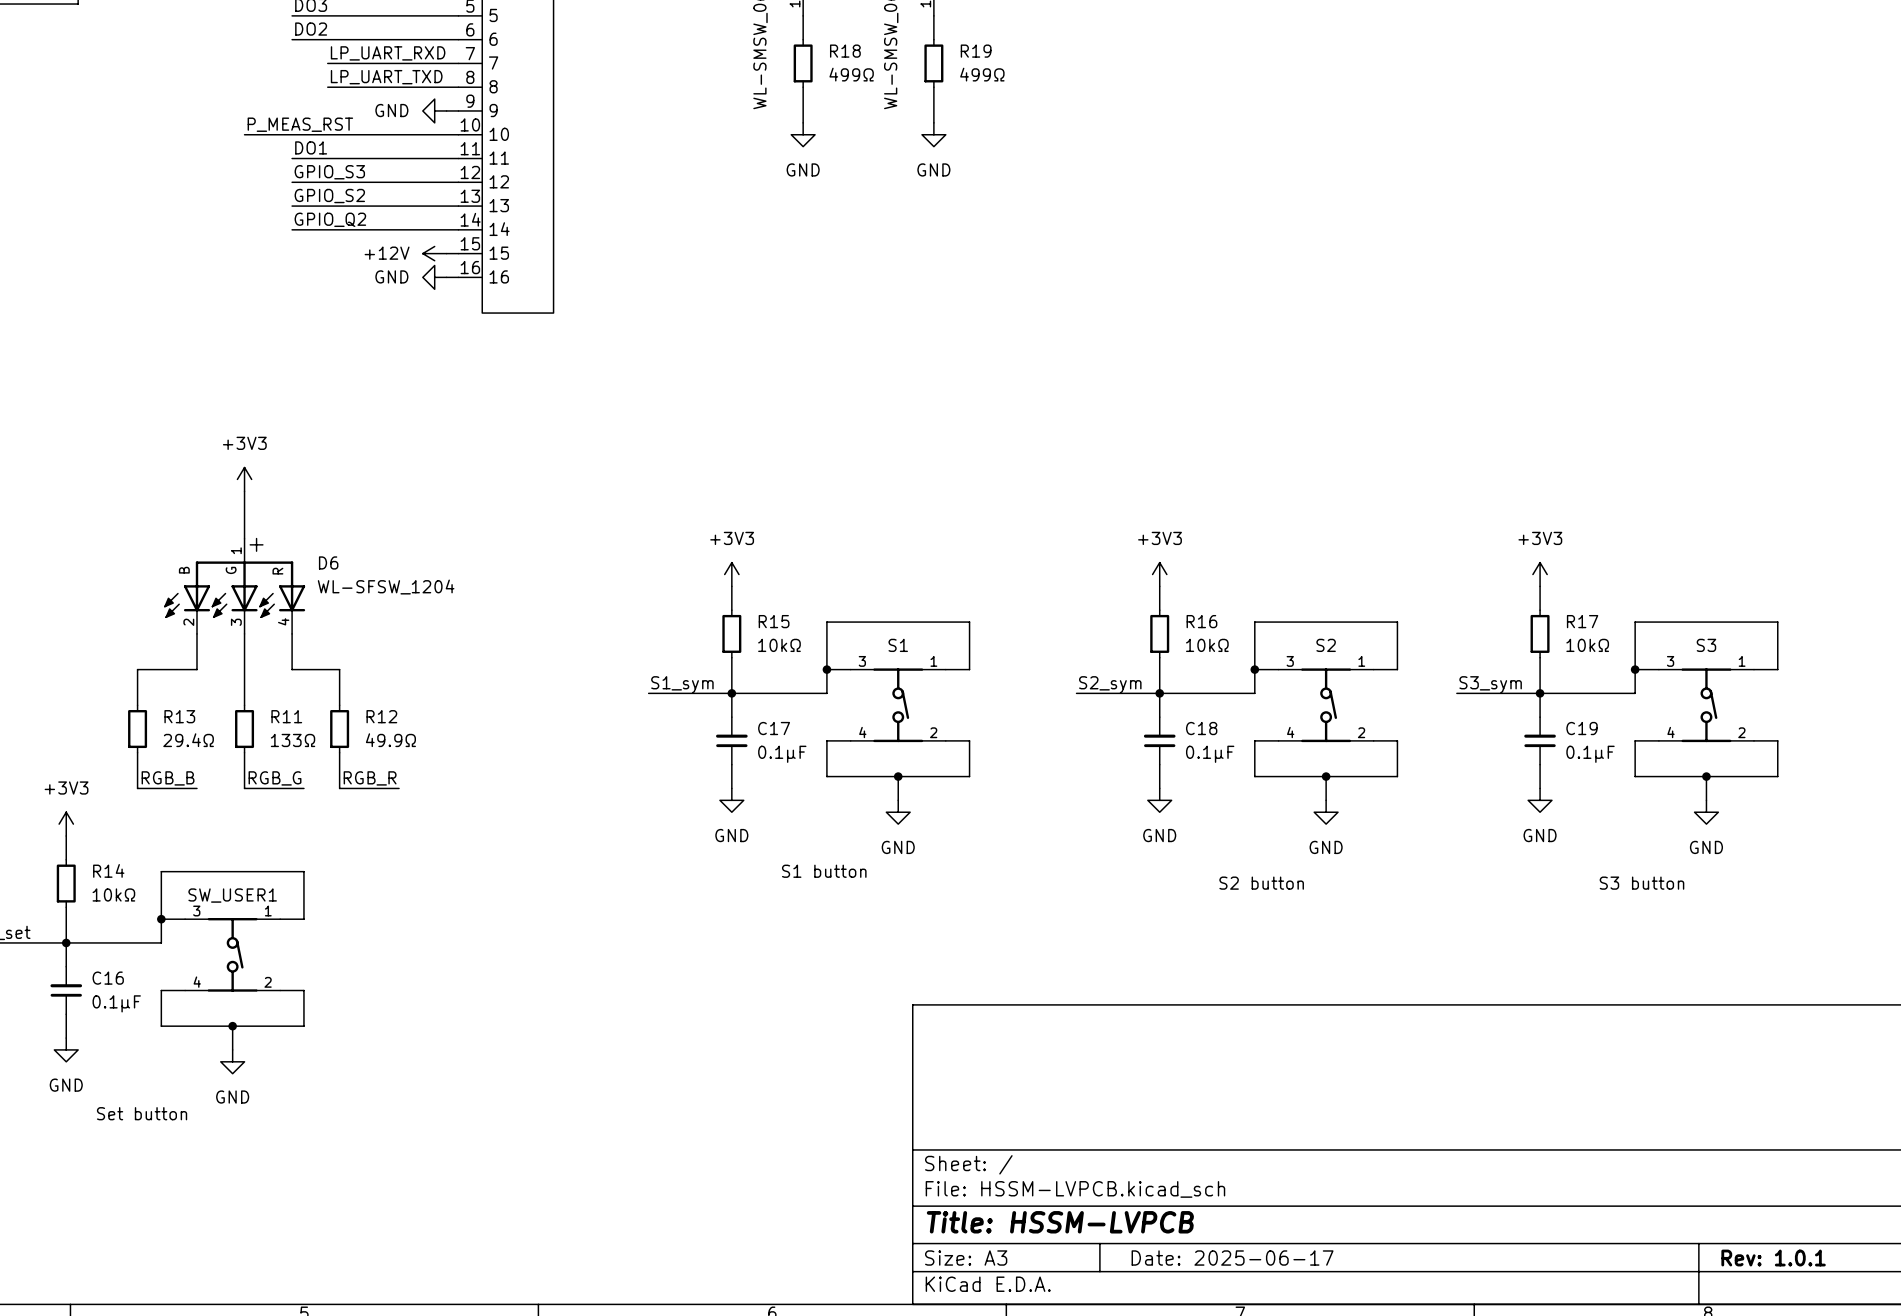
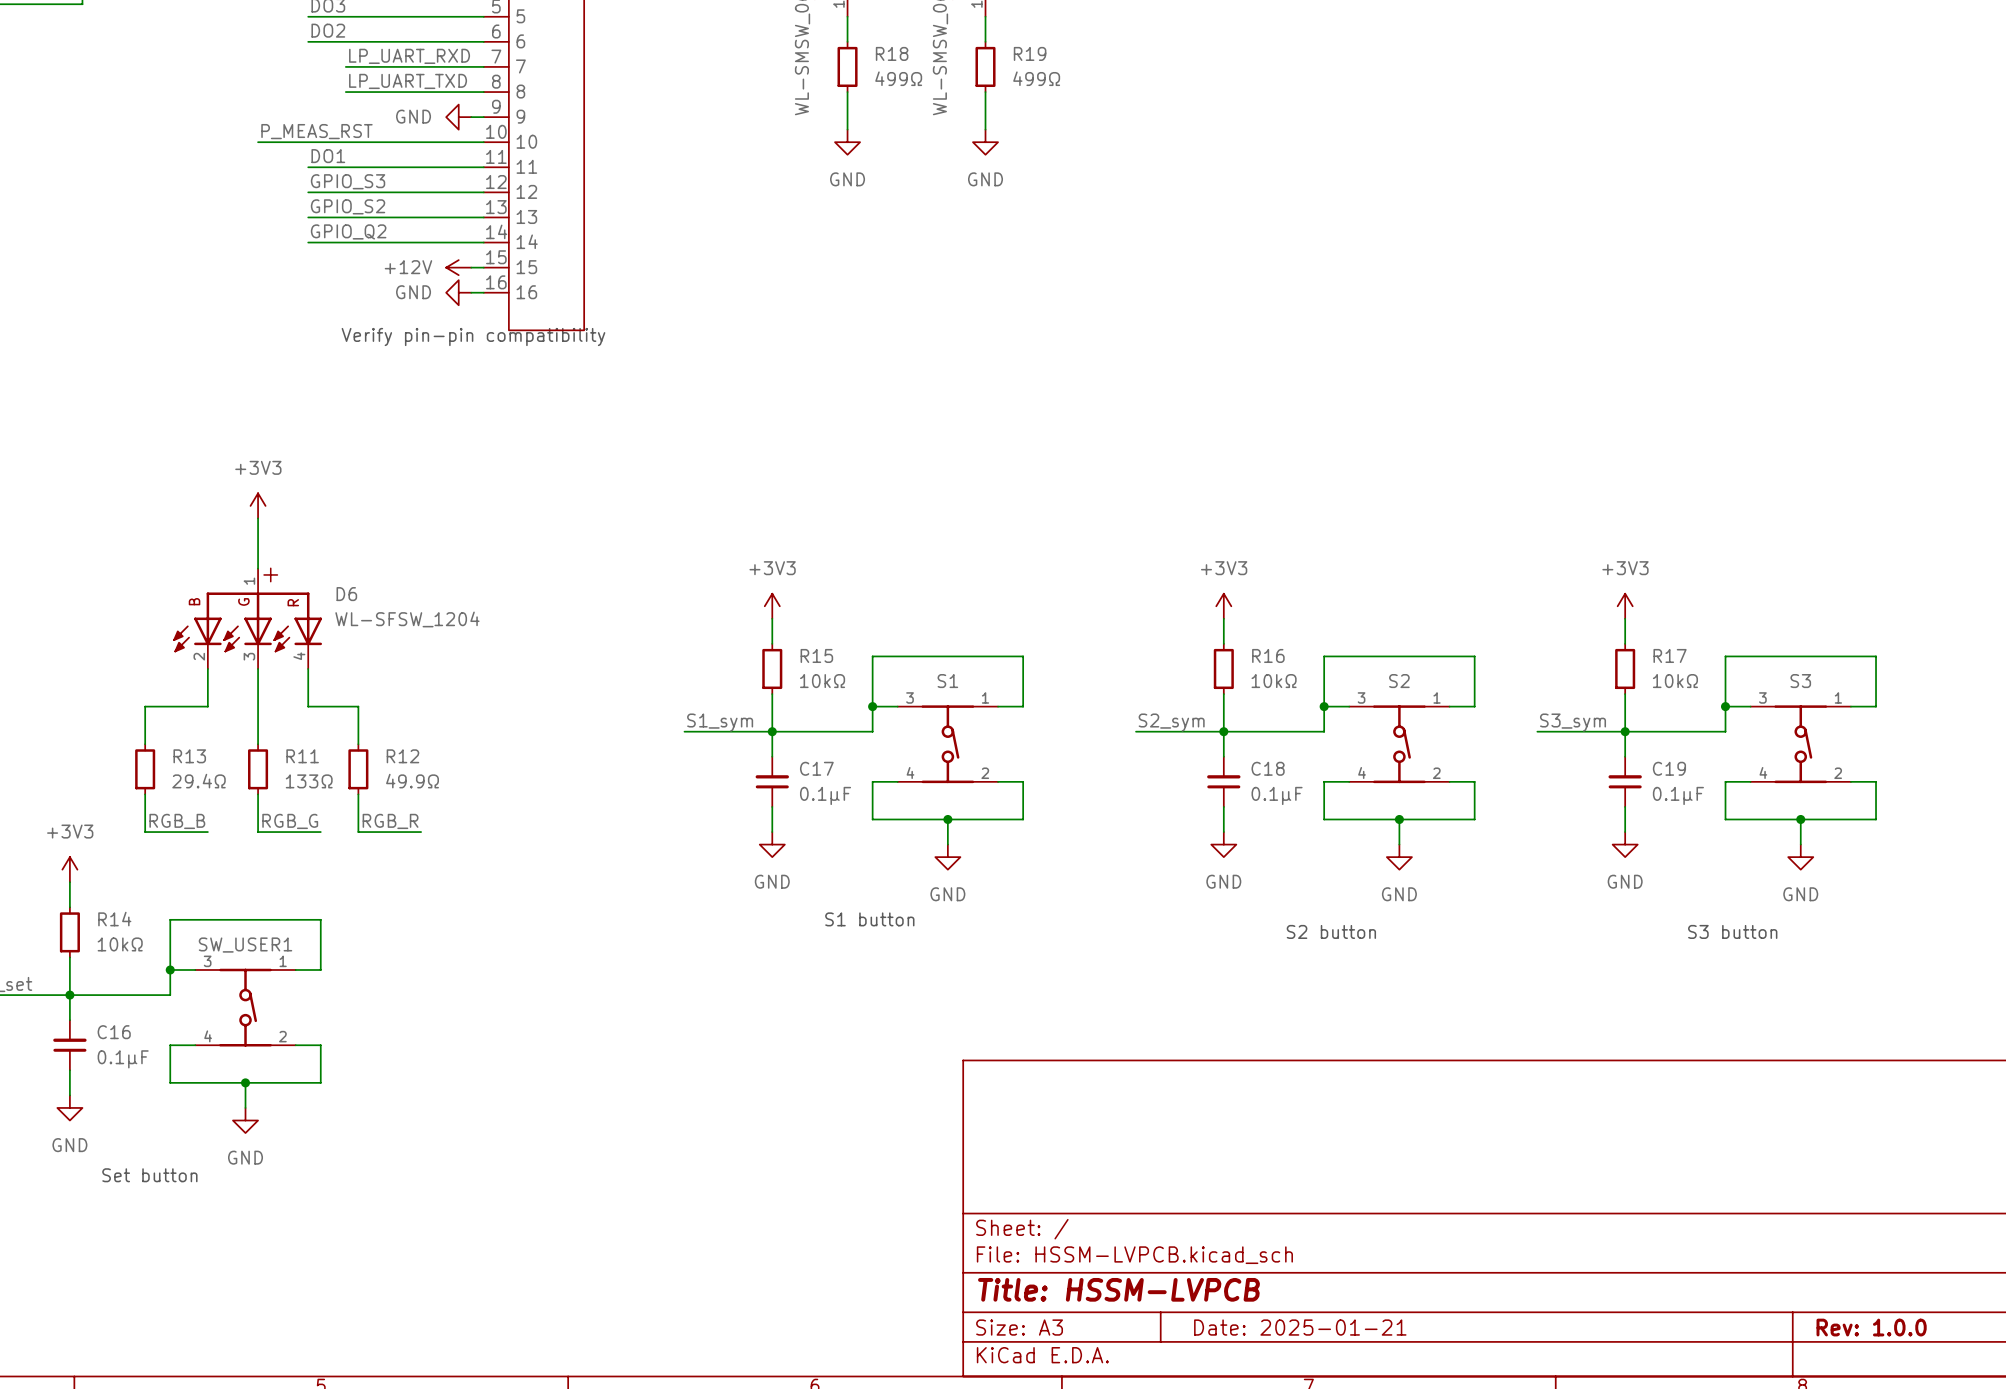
text: none -> Verify pin-pin compatibility (473, 337)
title block: Date: 2025-06-17 (1232, 1258) -> Date: 2025-01-21 (1300, 1327)
title block: Rev: 1.0.1 (1773, 1258) -> Rev: 1.0.0 (1871, 1327)

